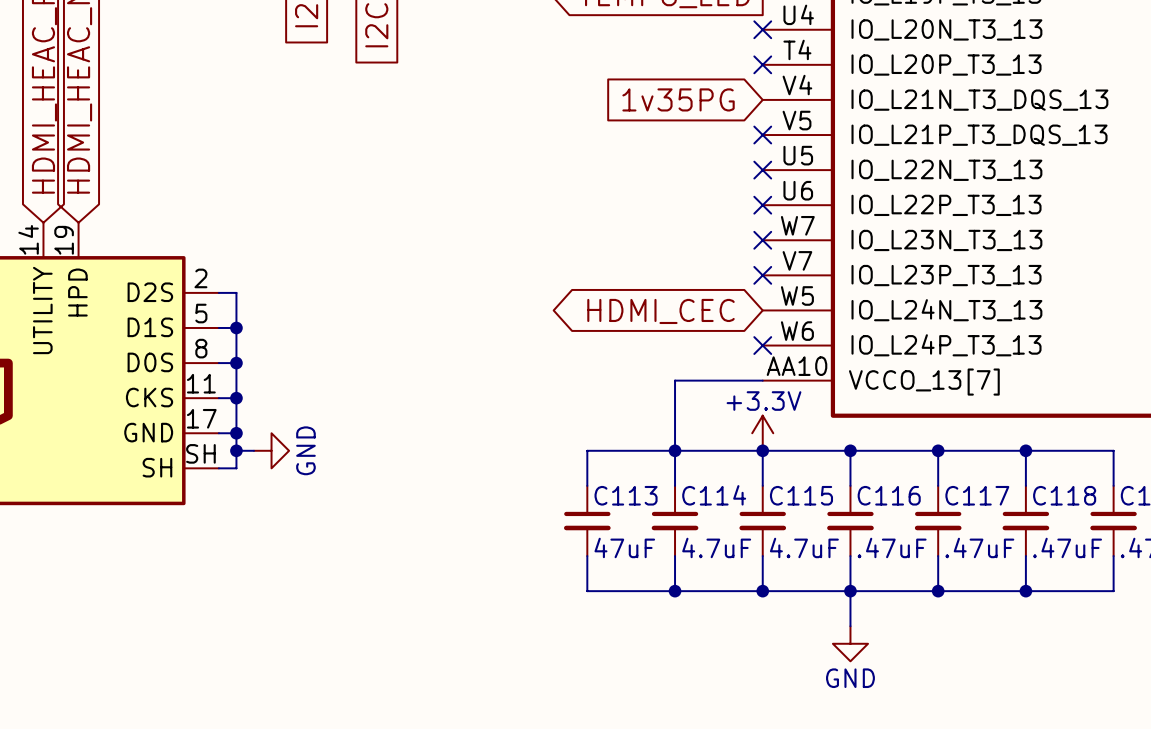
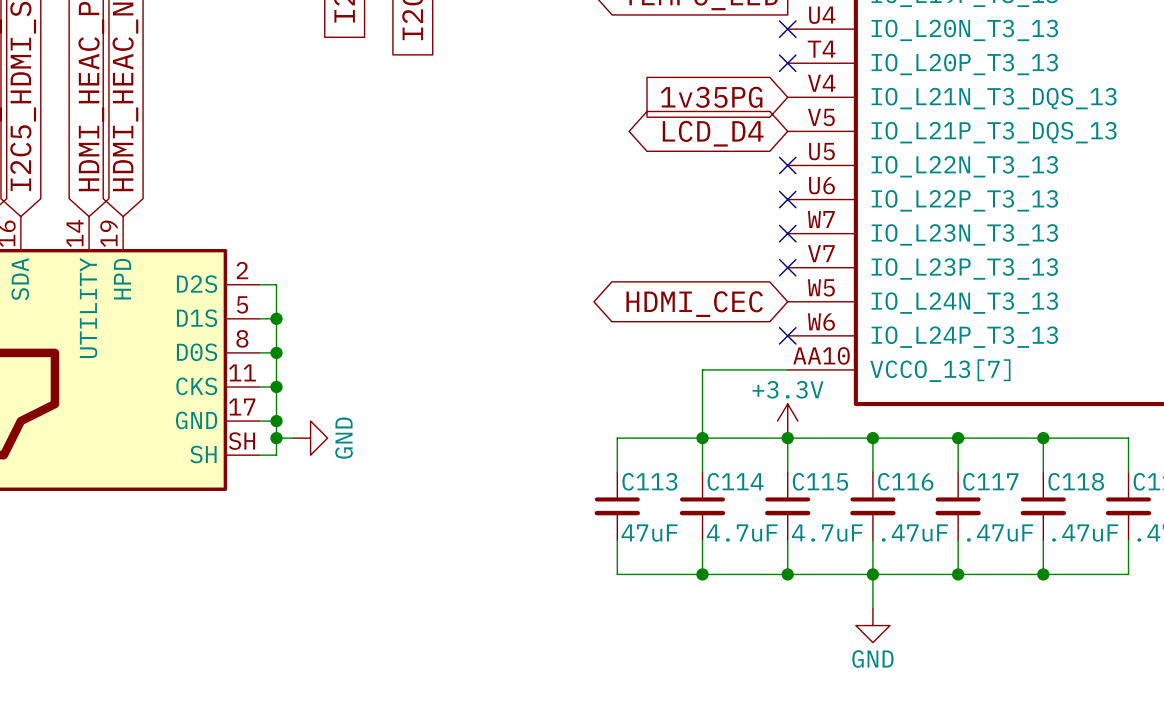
global label: none -> LCD_D4 (713, 133)
no-connect mark: (762, 135) -> none

